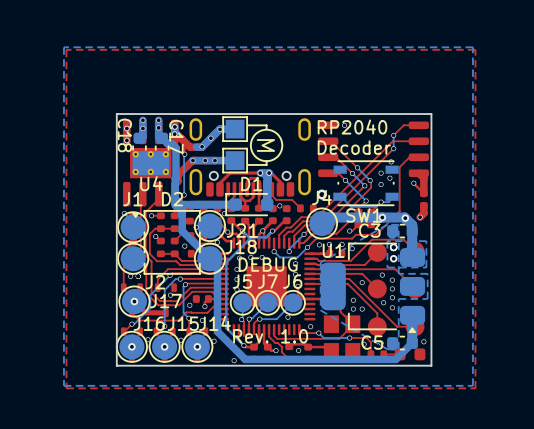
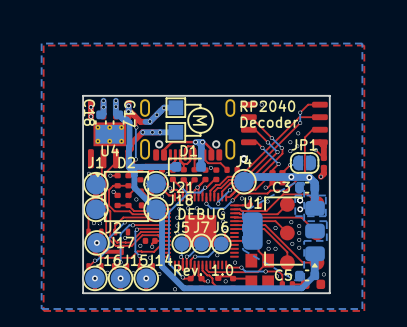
SW1: (366, 183) -> none
bottom track: (341, 196) (351, 206) (376, 206) (381, 202) -> none
JP1: none -> (304, 162)

